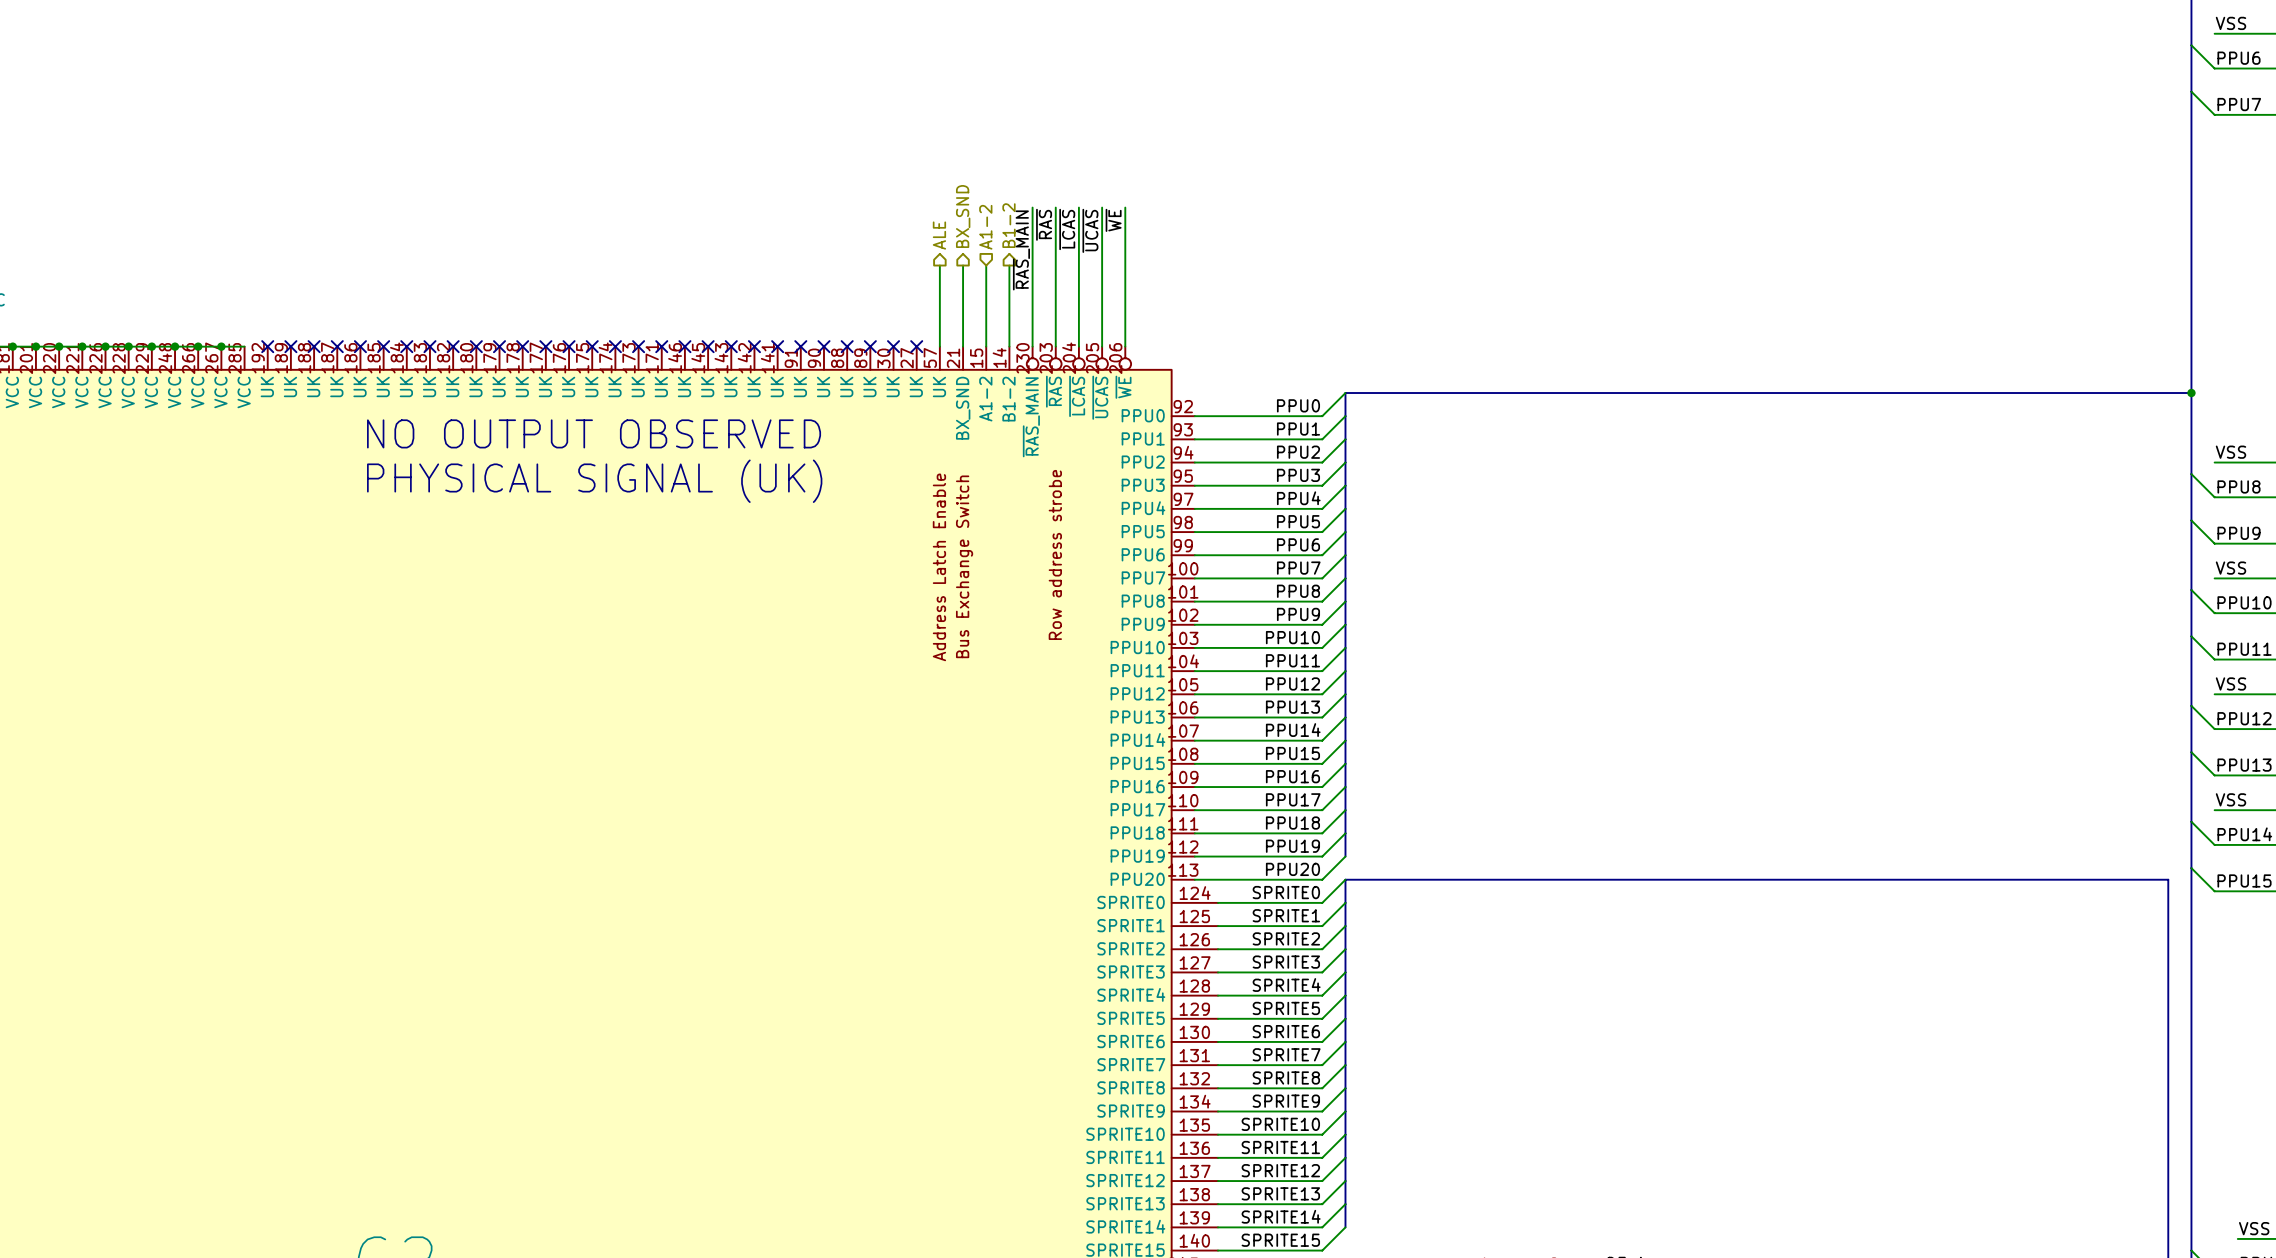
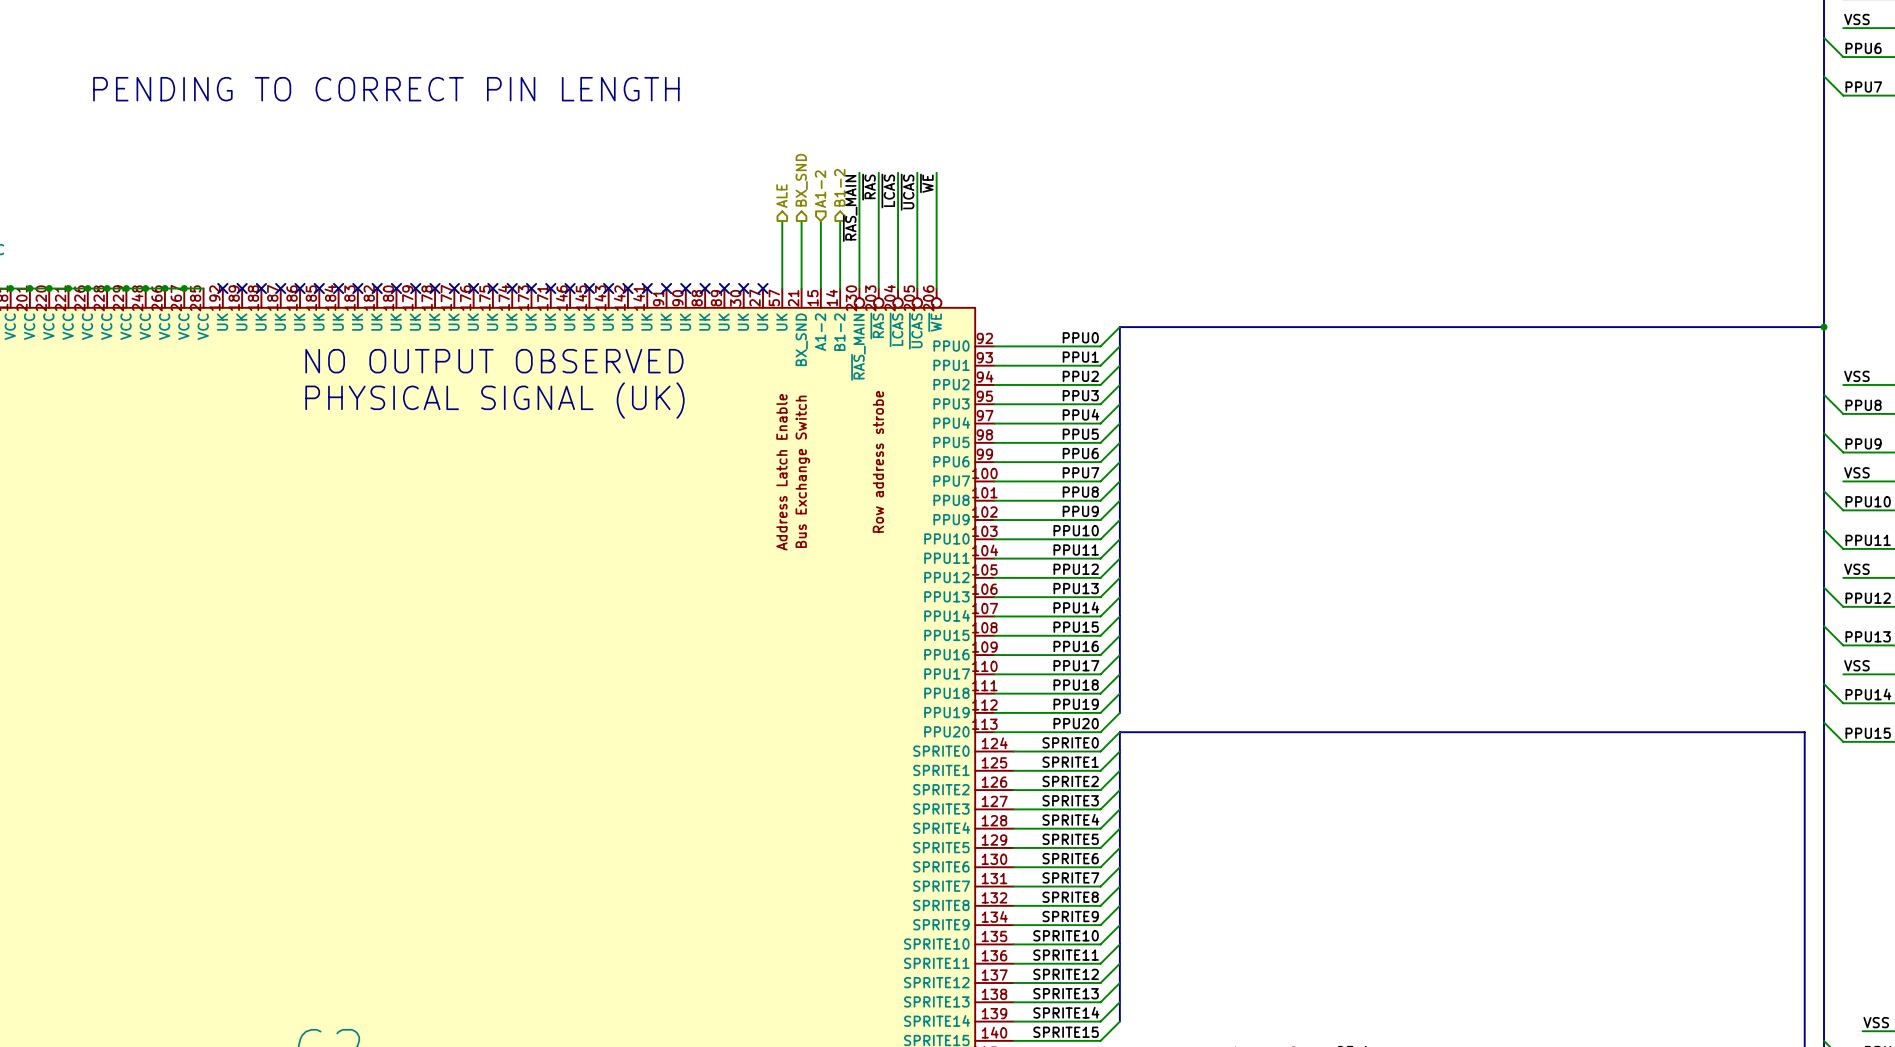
text: none -> PENDING TO CORRECT PIN LENGTH (386, 89)

